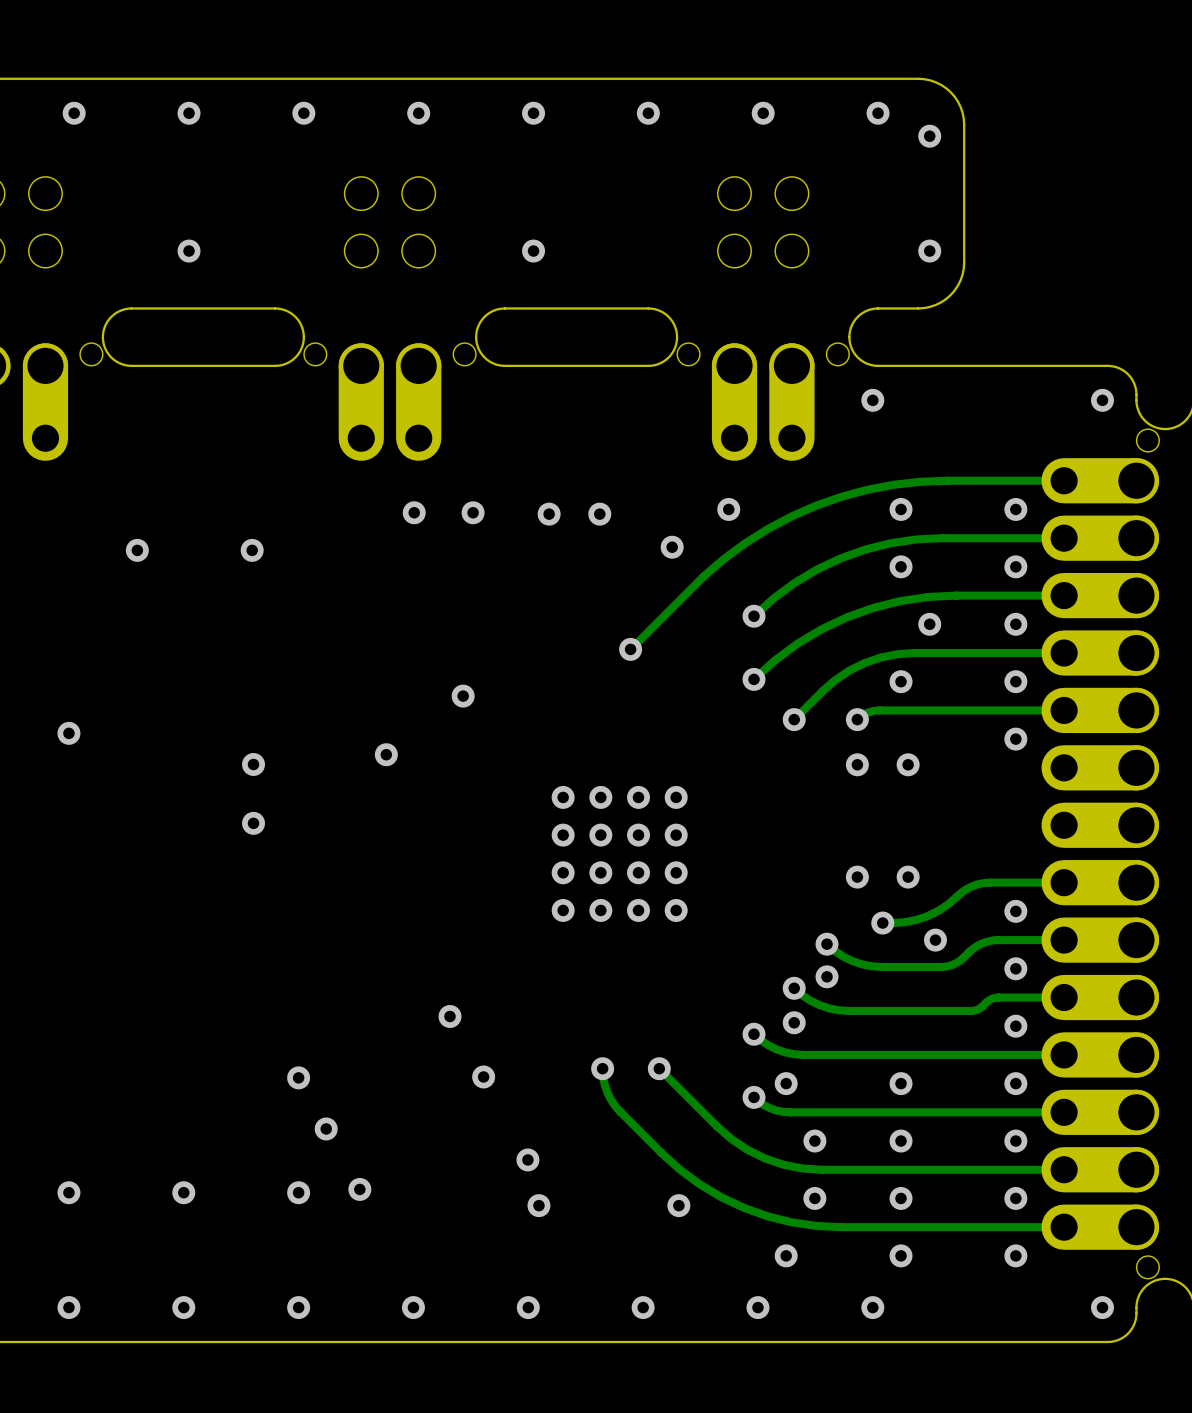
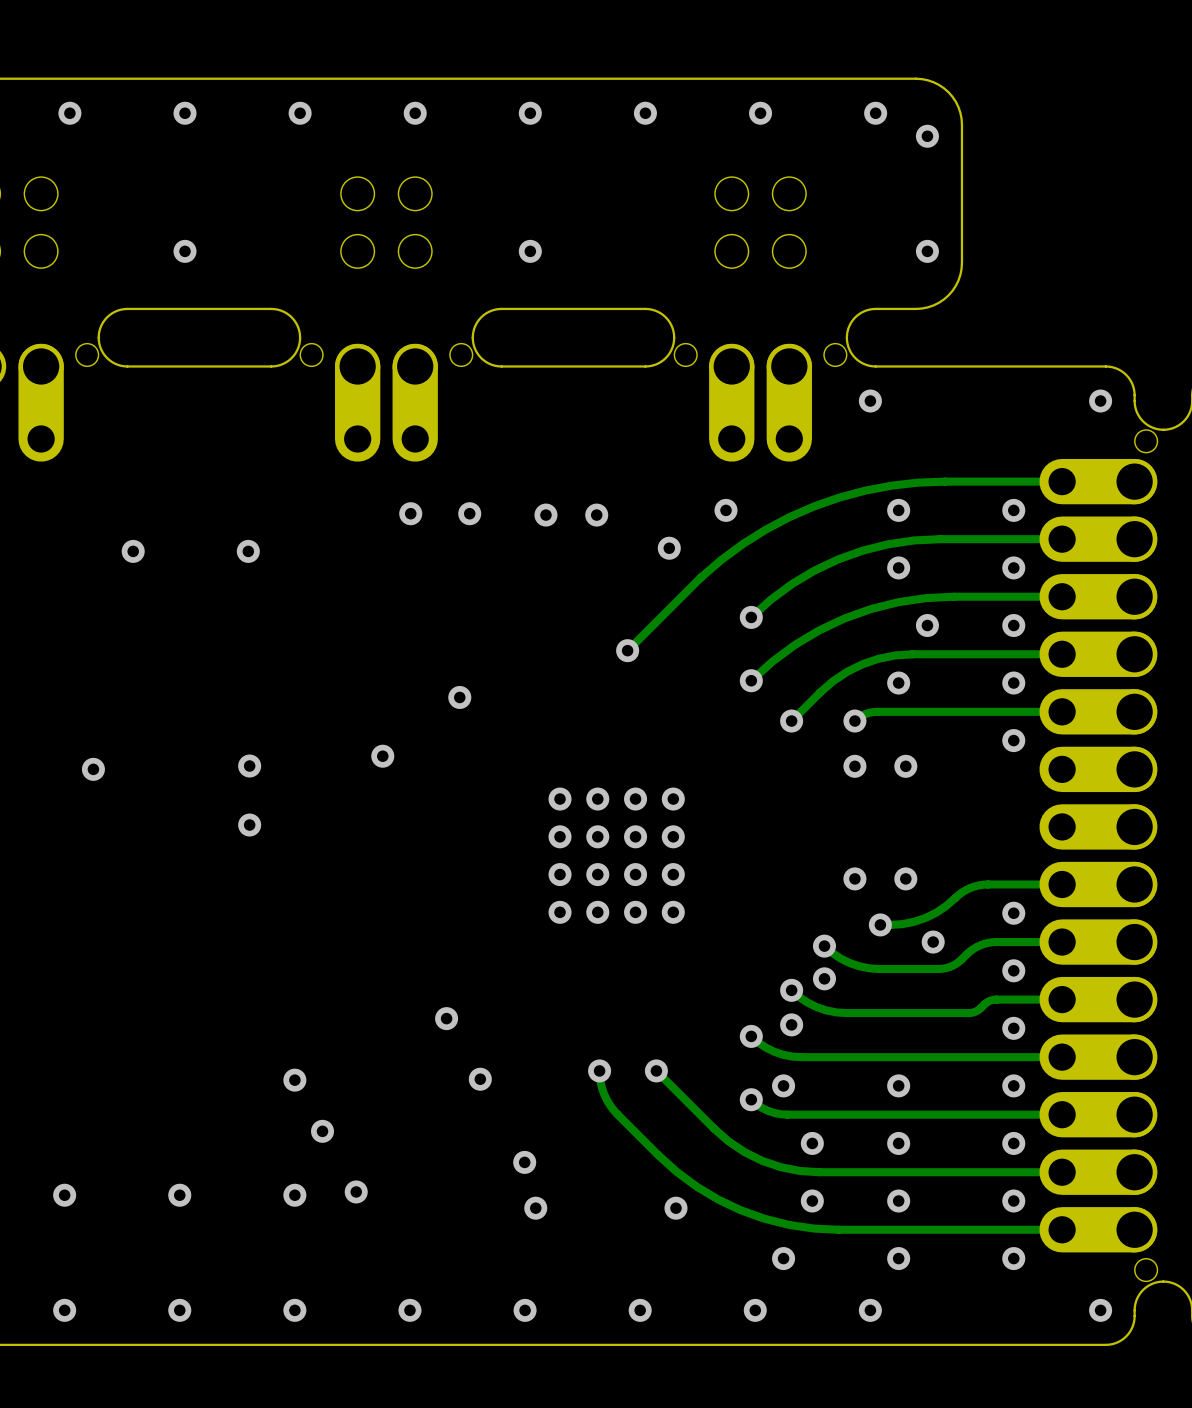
via position: (68, 733) -> (93, 769)

